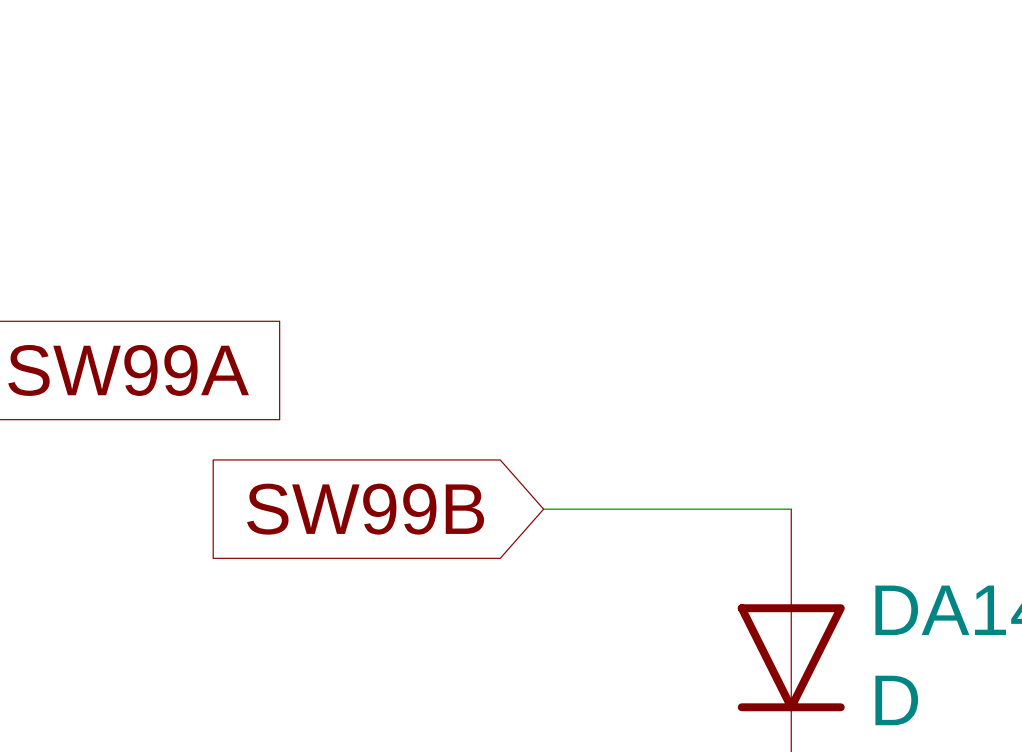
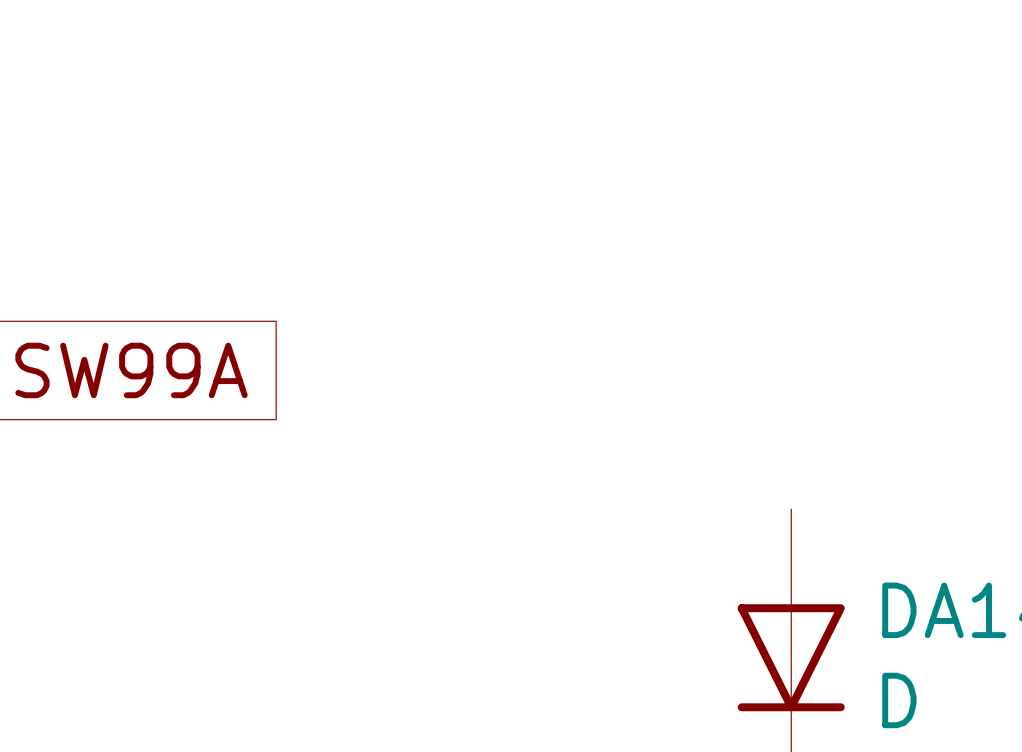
global label: SW99B (365, 509) -> none
wire: (543, 509) (791, 509) -> none

